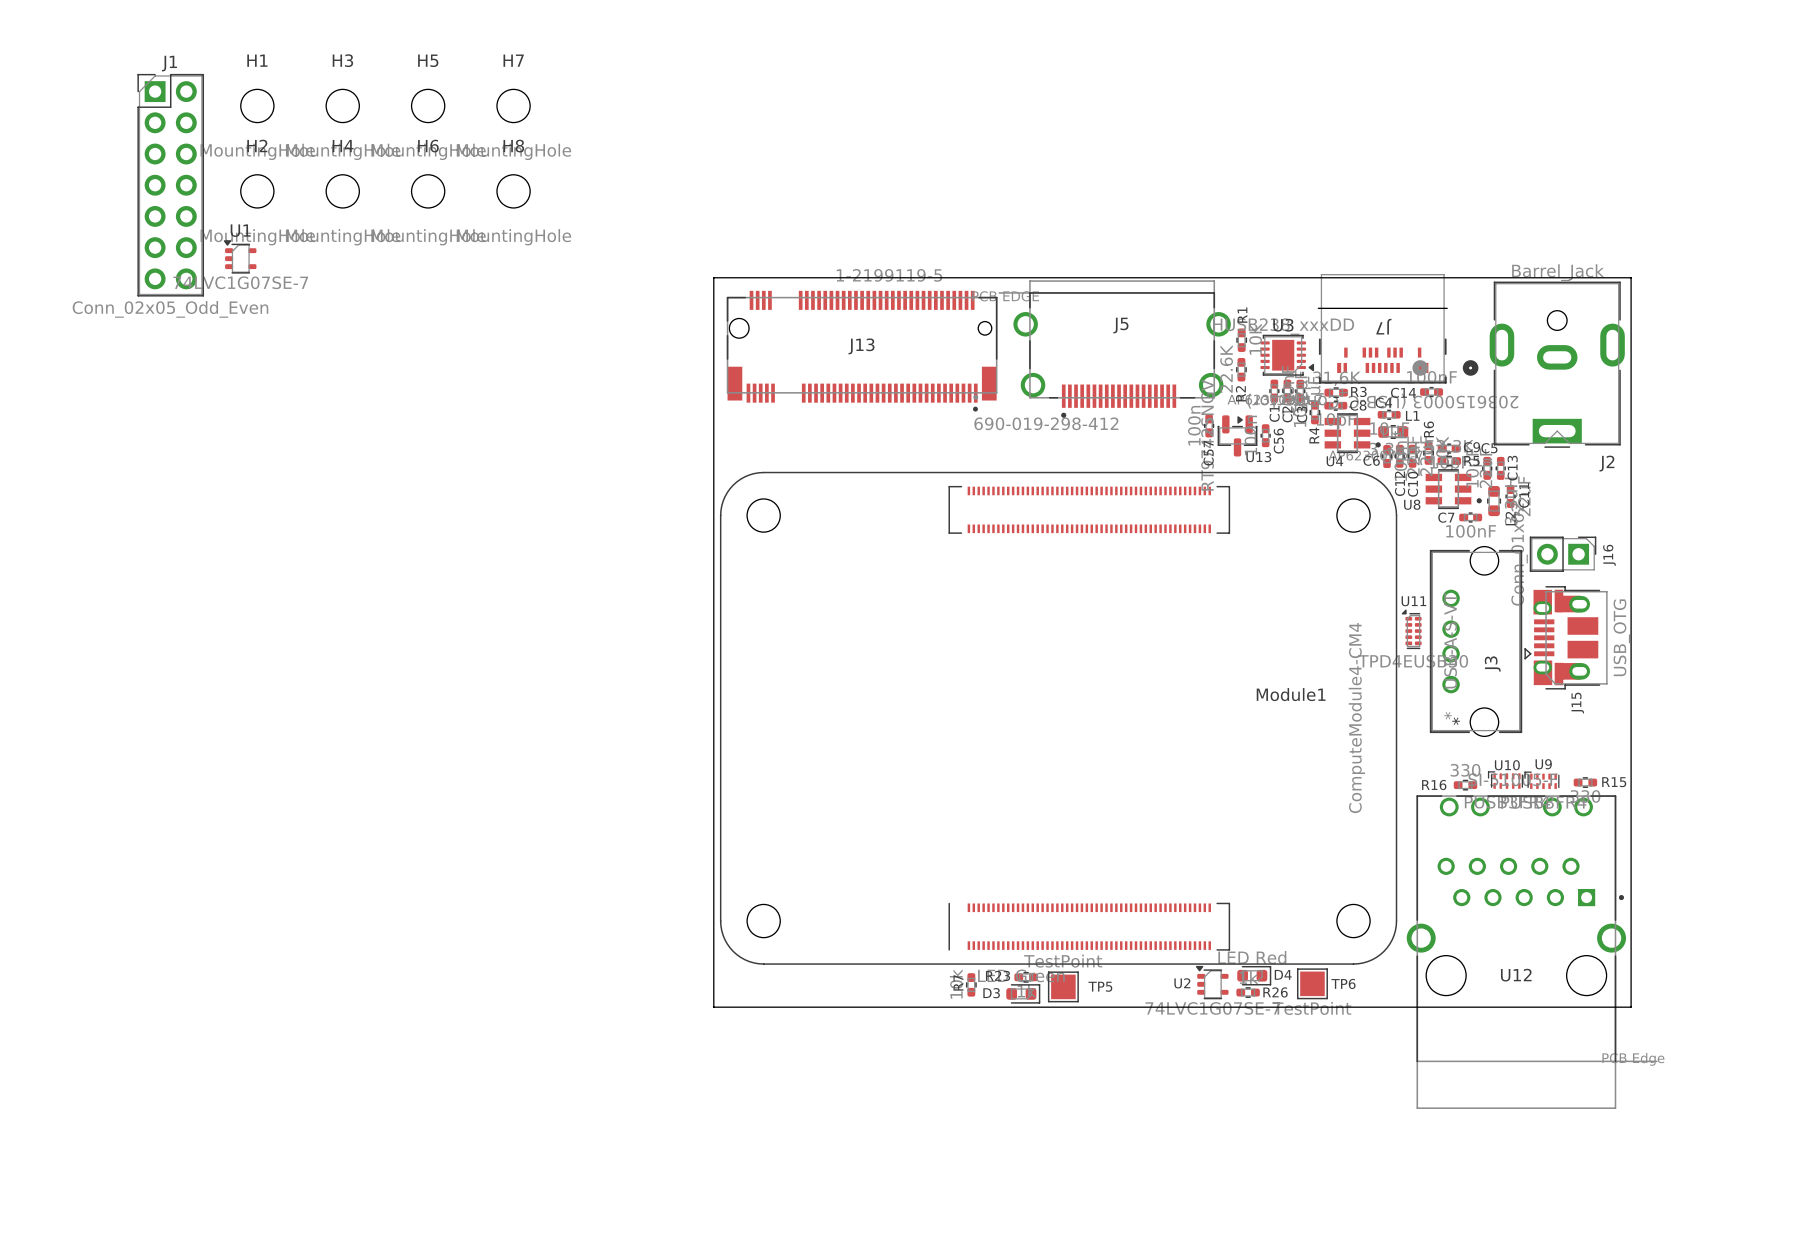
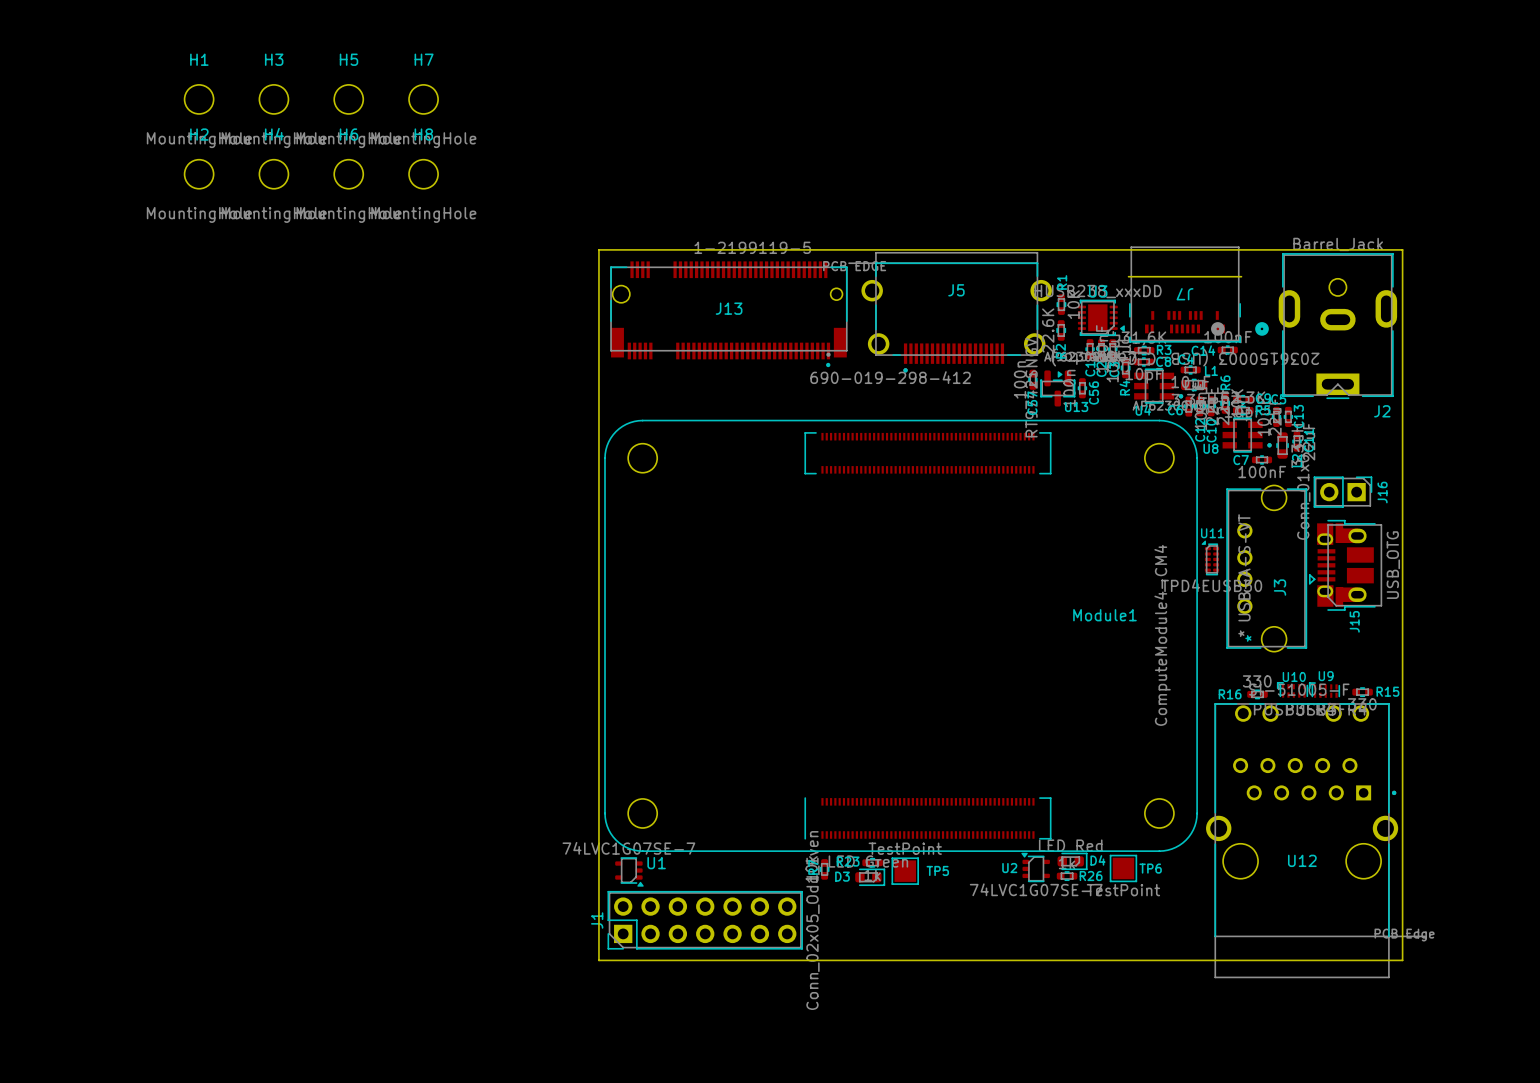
J1 rotation: 0° (170, 185) -> 90° counterclockwise (705, 920)
J1 position: (170, 185) -> (705, 920)
U1 name position: U1 (240, 230) -> U1 (656, 863)
U1 rotation: 0° (240, 256) -> 180° (629, 872)
U1 position: (240, 256) -> (629, 872)
board edge: (713, 1007) (1631, 1007) -> (598, 888) (598, 960) (1402, 960) (1402, 888)

